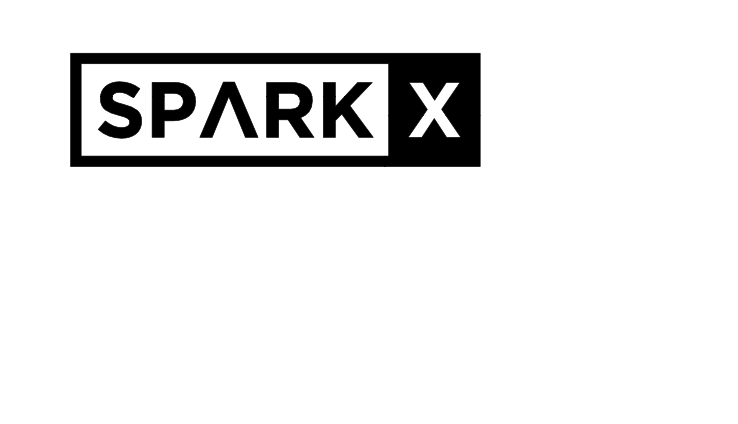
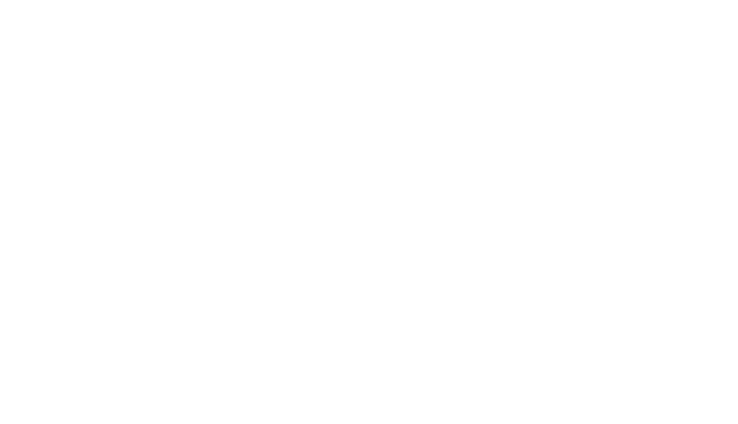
drawing: [70, 52, 481, 167] -> none

